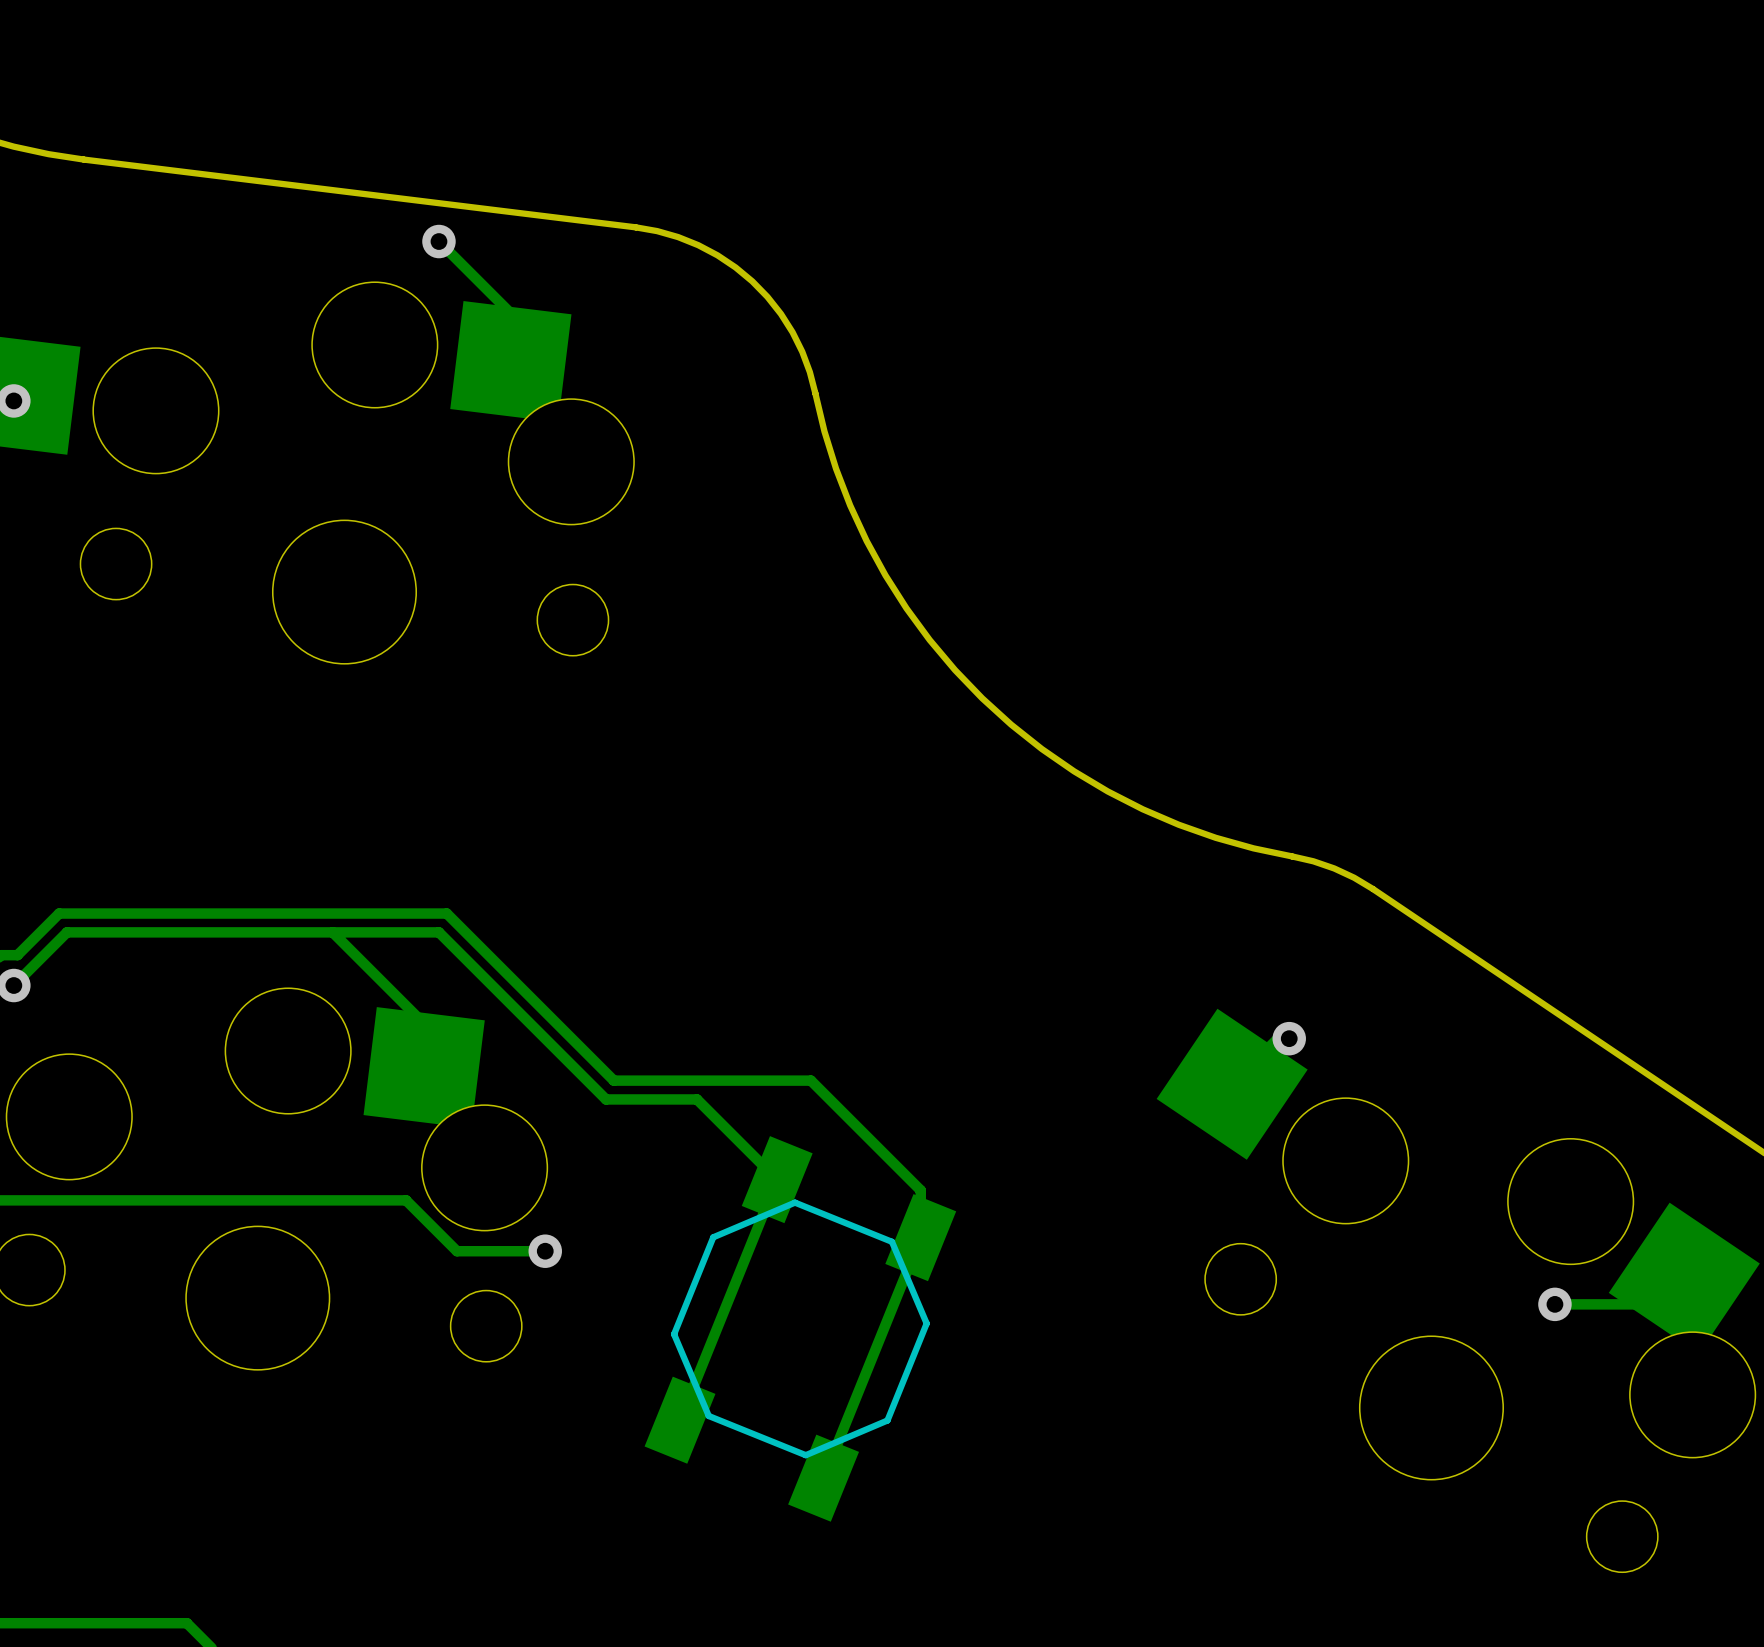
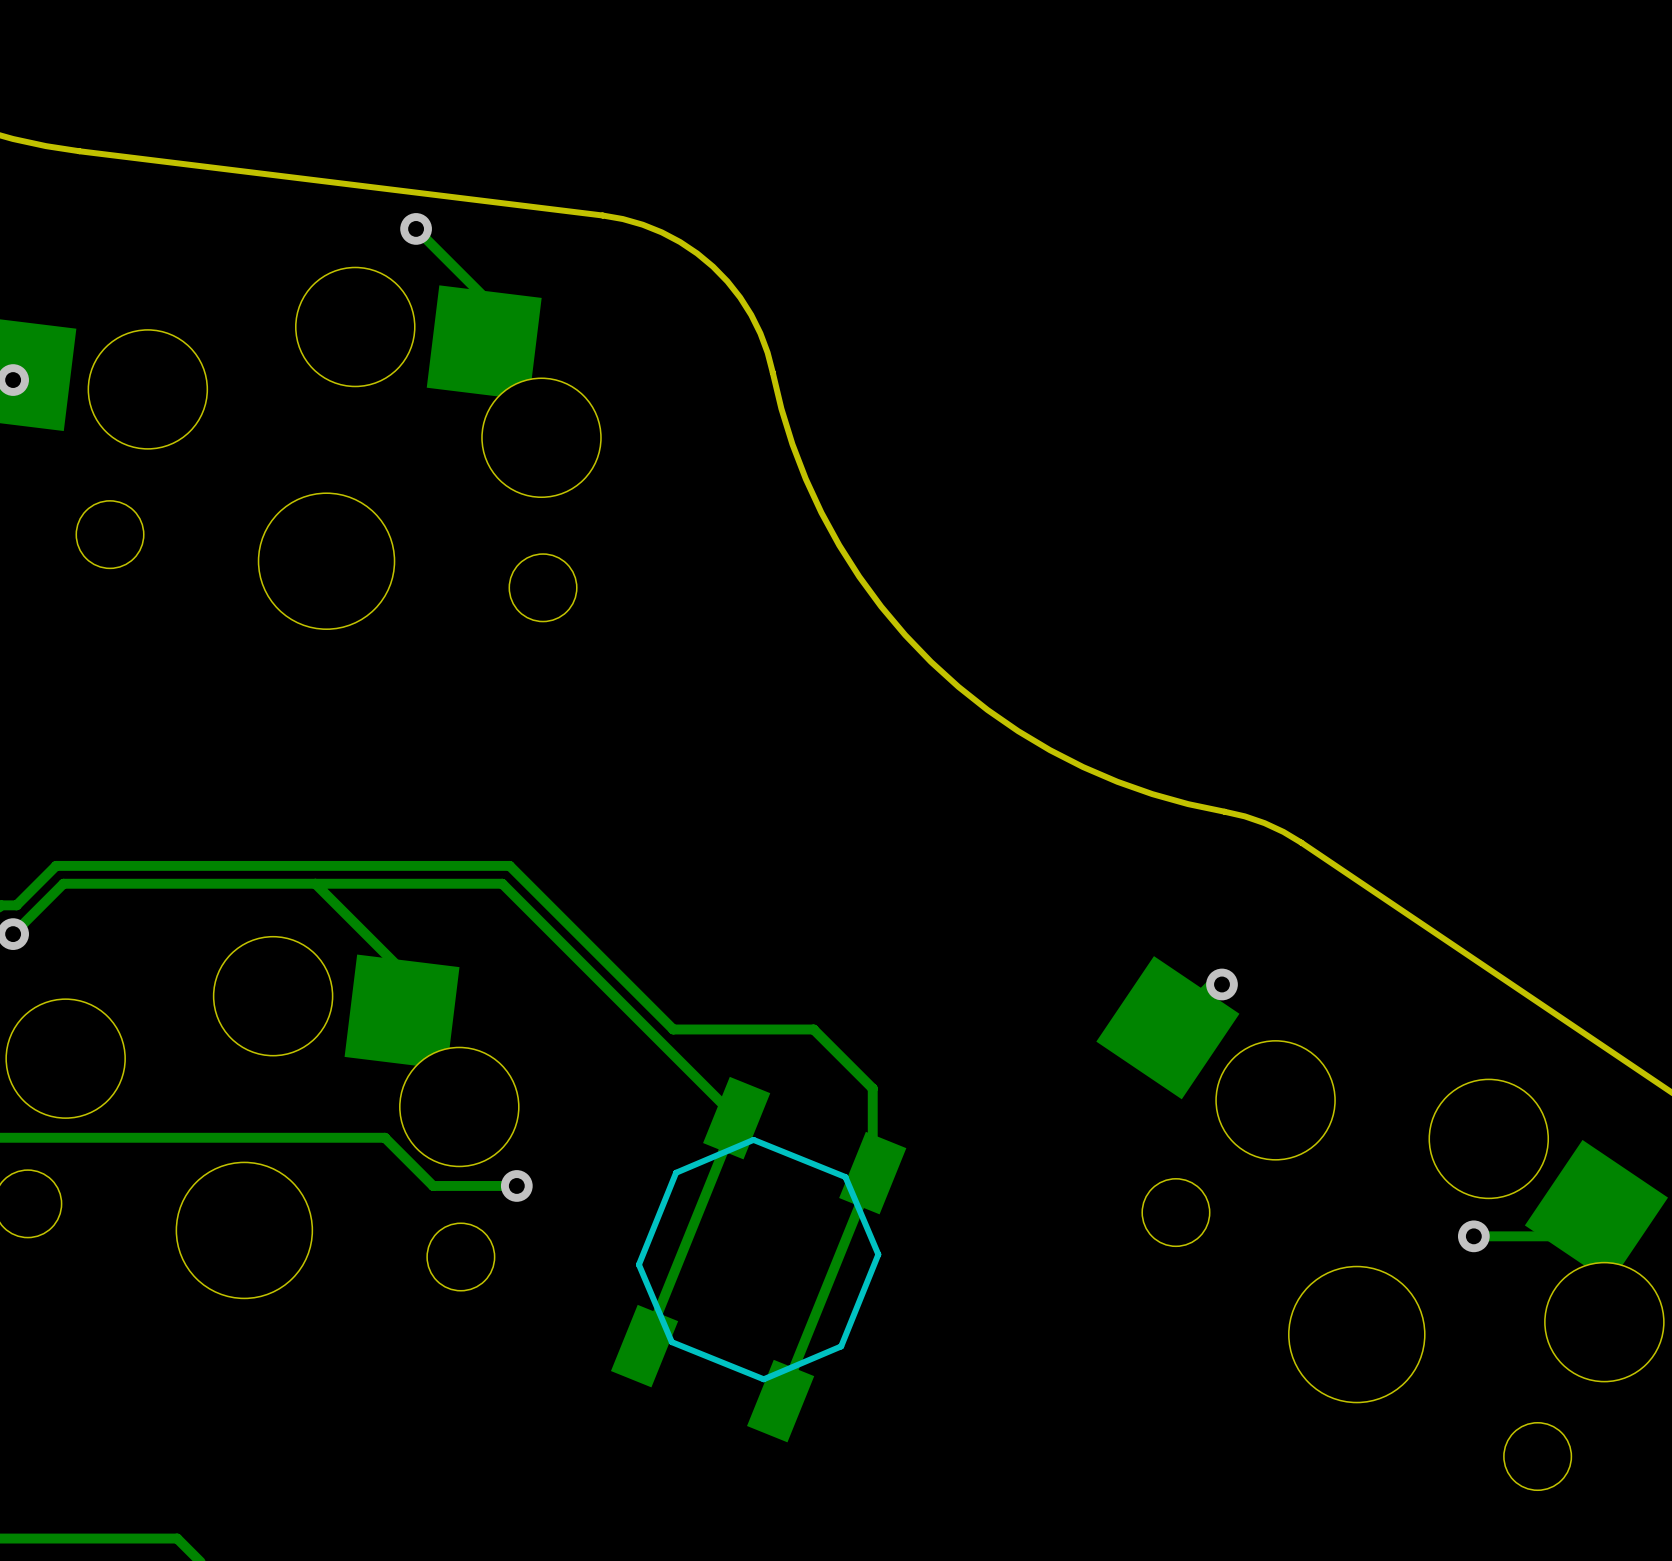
track: (446, 913) (613, 1080) (810, 1080) (920, 1190) -> (423, 865) (509, 865) (673, 1029) (813, 1029) (872, 1088) (872, 1128)
track: (438, 932) (606, 1099) (697, 1099) -> (416, 883) (502, 883) (660, 1042)

